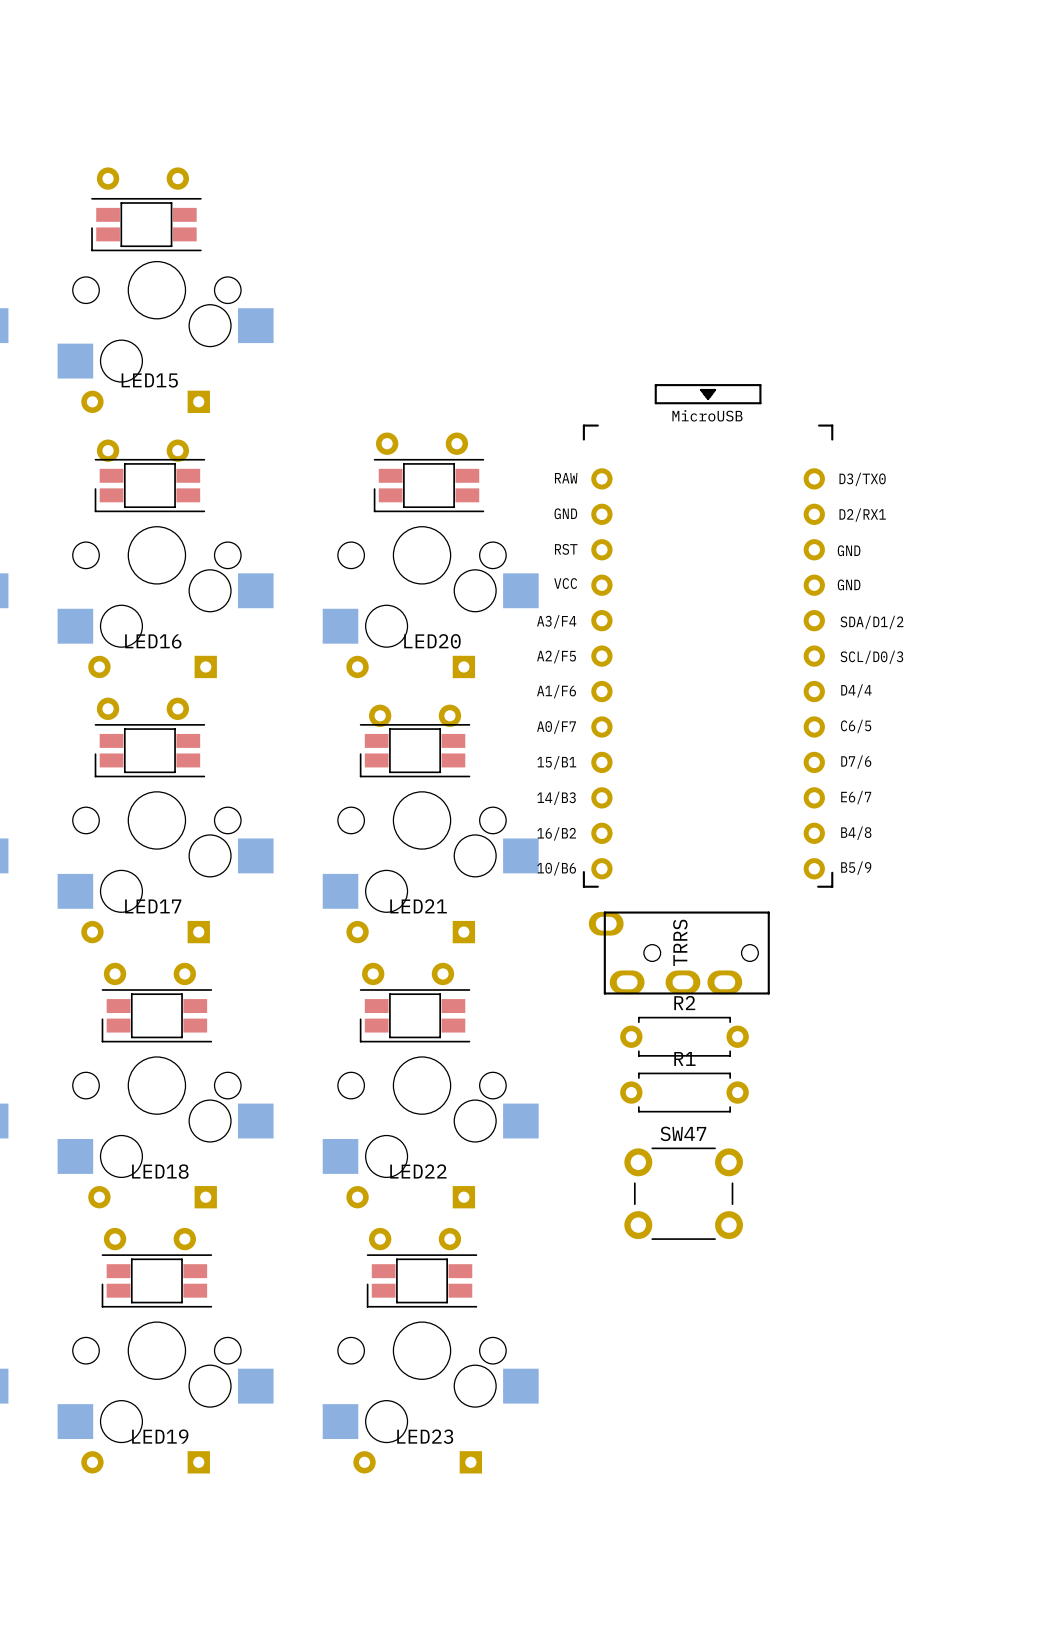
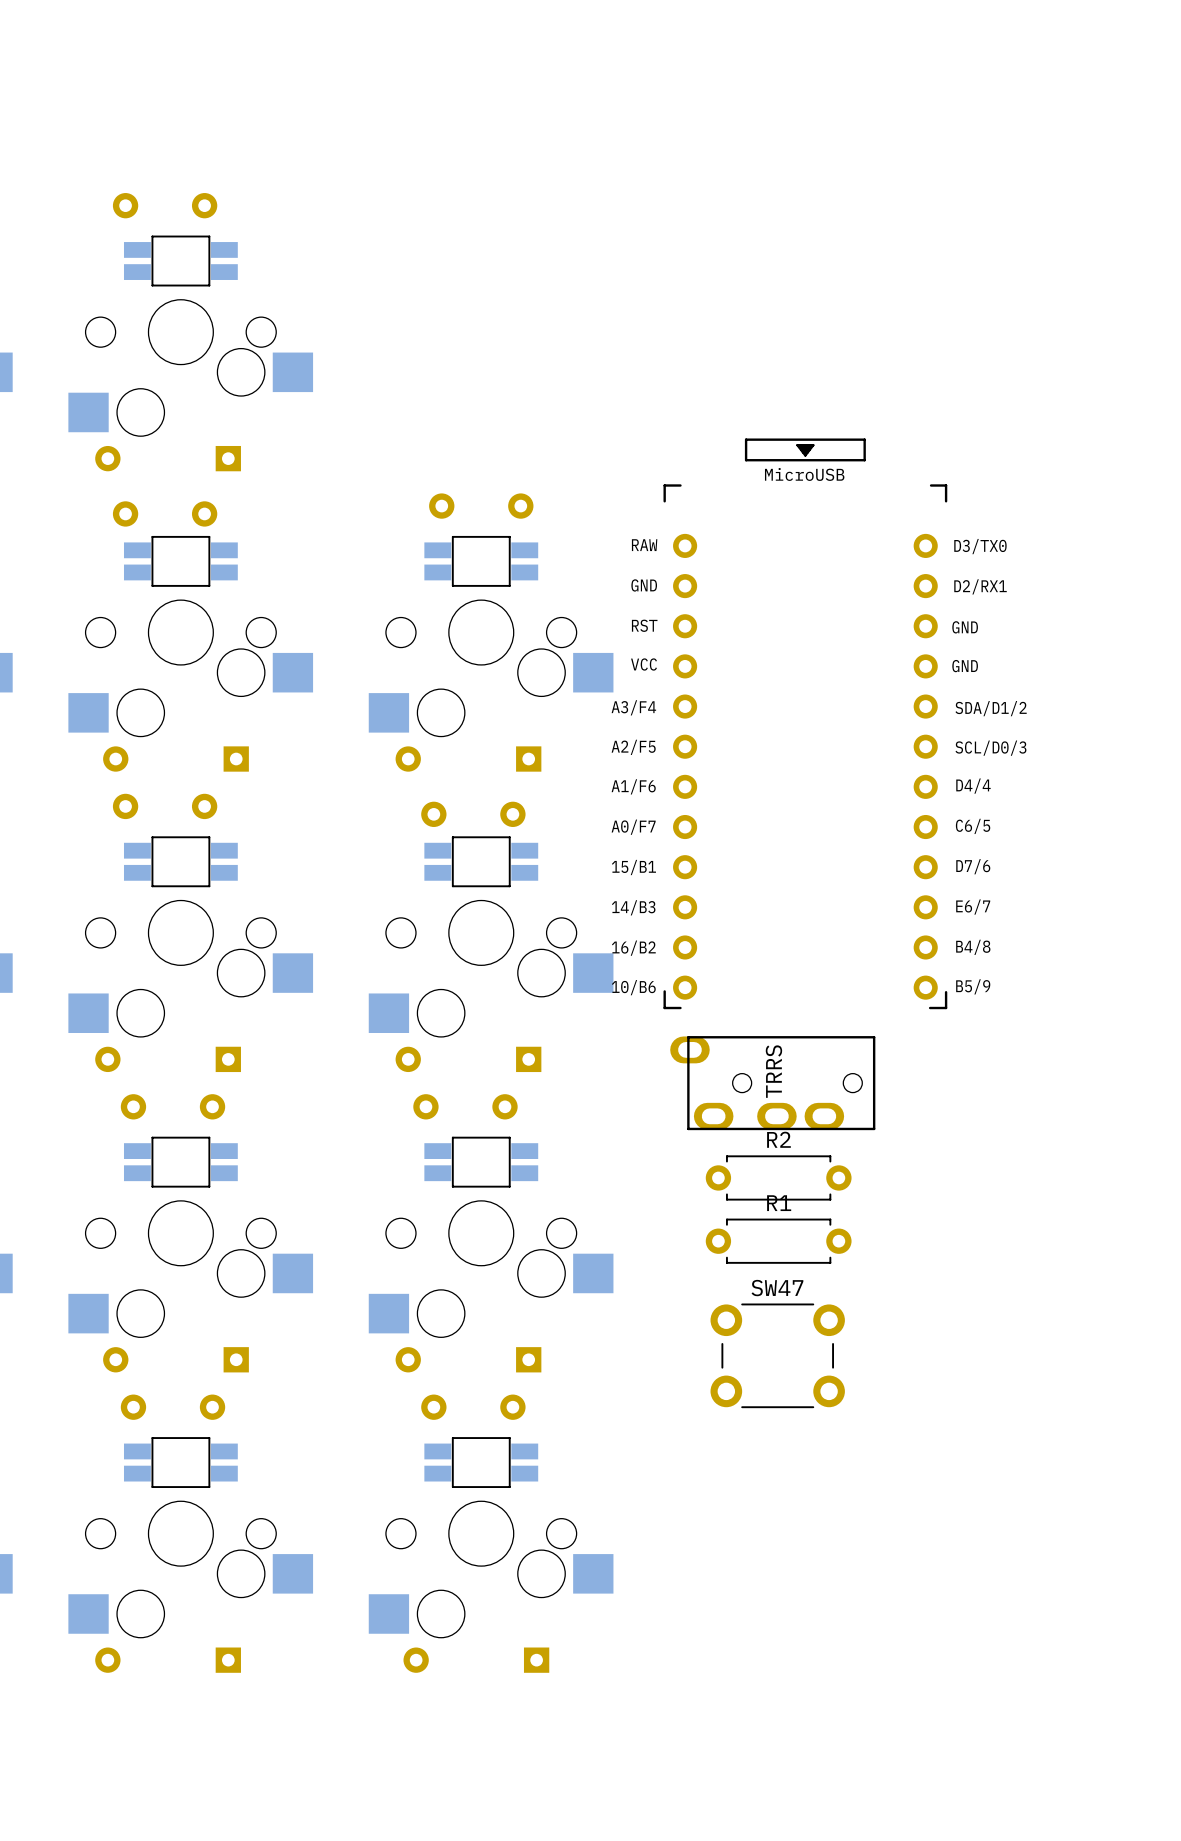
LED15 side: top (146, 224) -> bottom (180, 261)
LED16 side: top (149, 485) -> bottom (180, 561)
LED20 side: top (429, 485) -> bottom (481, 561)
LED17 side: top (149, 750) -> bottom (180, 861)
LED21 side: top (415, 750) -> bottom (481, 861)
LED18 side: top (156, 1015) -> bottom (180, 1162)
LED22 side: top (415, 1015) -> bottom (481, 1162)
LED19 side: top (156, 1280) -> bottom (180, 1462)
LED23 side: top (422, 1280) -> bottom (481, 1462)

